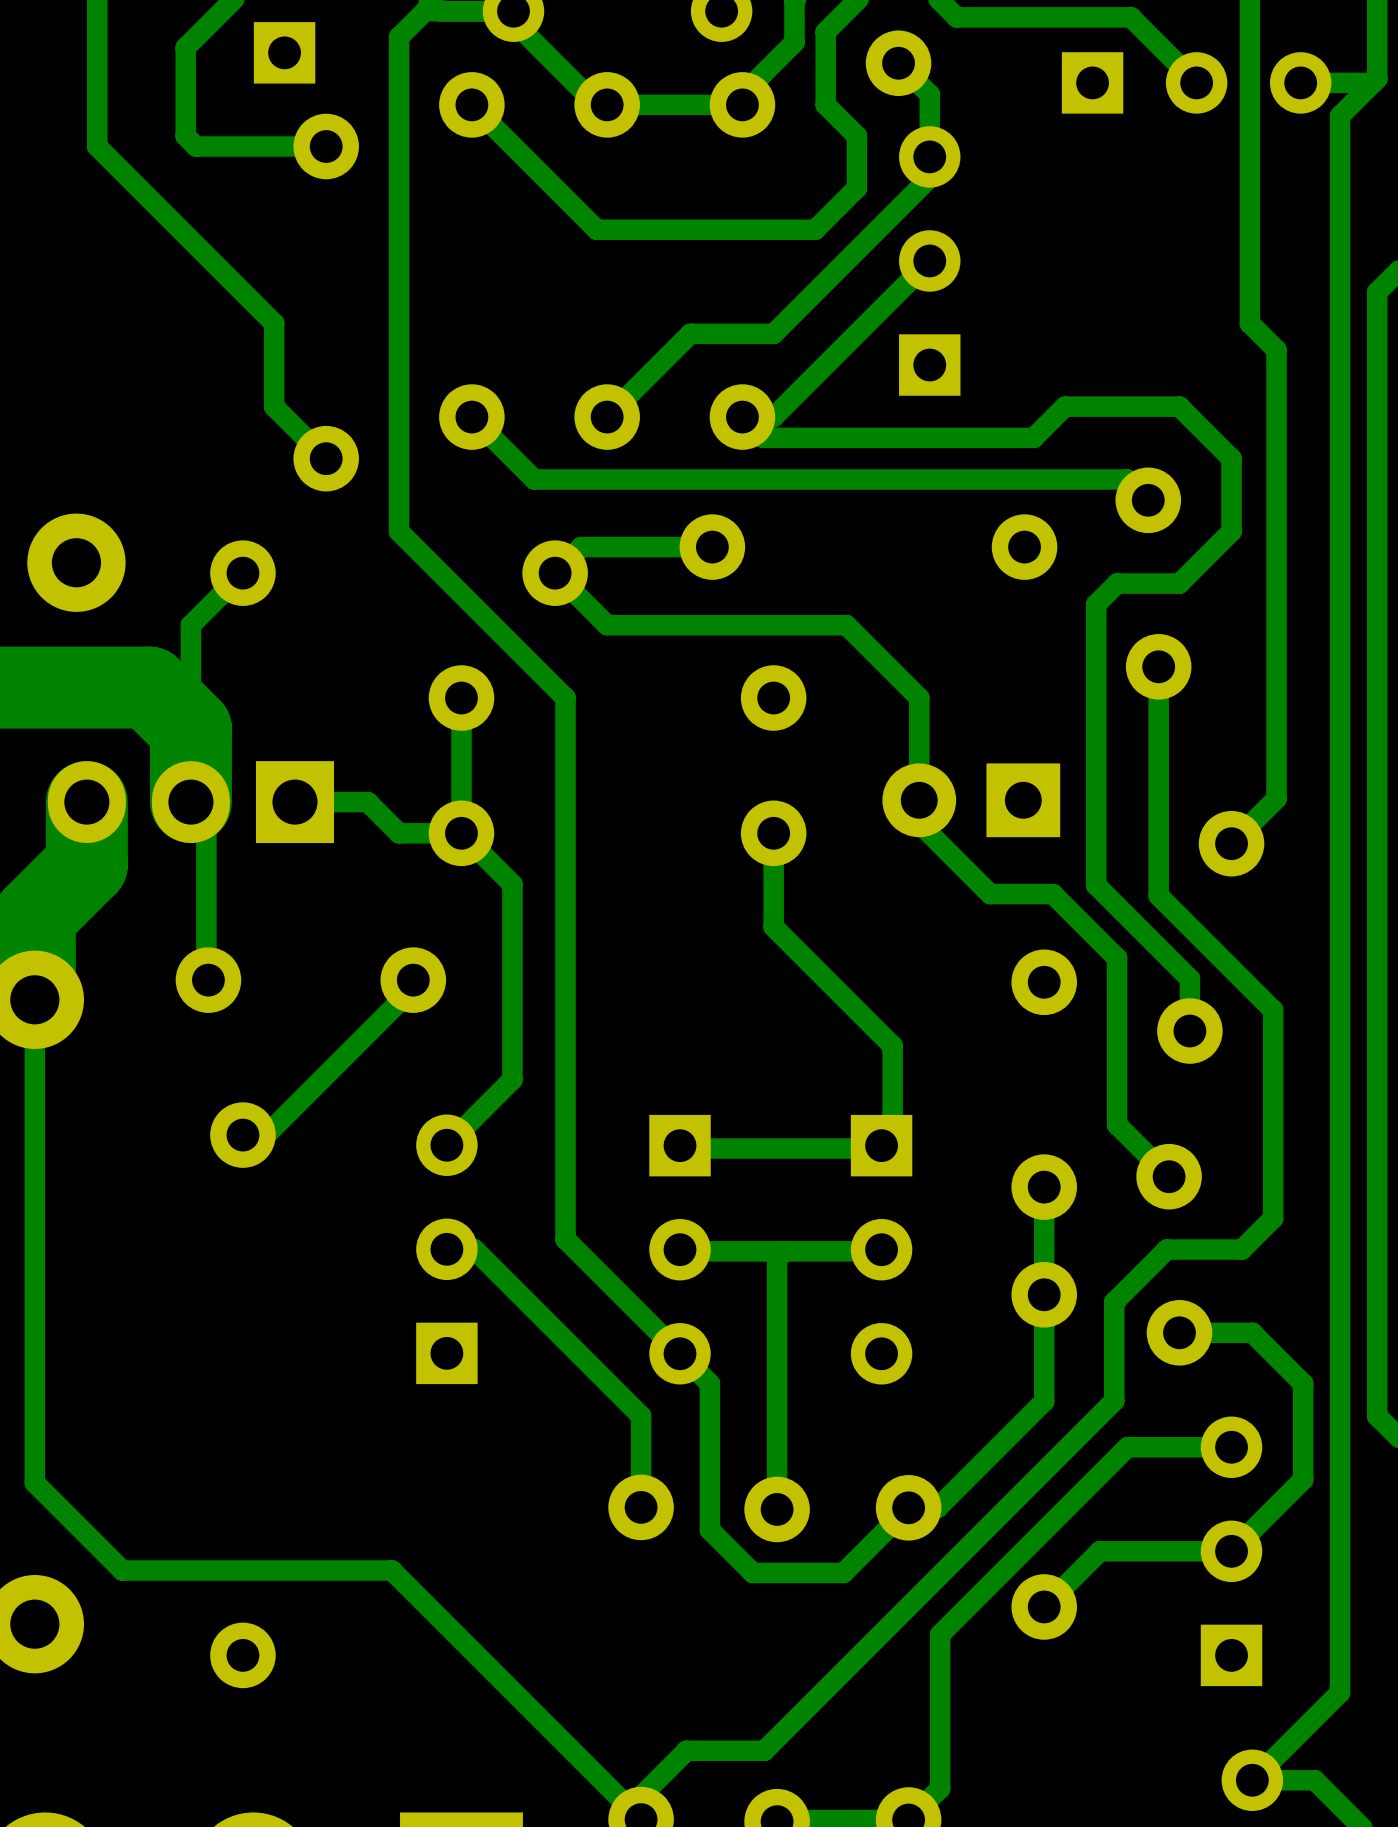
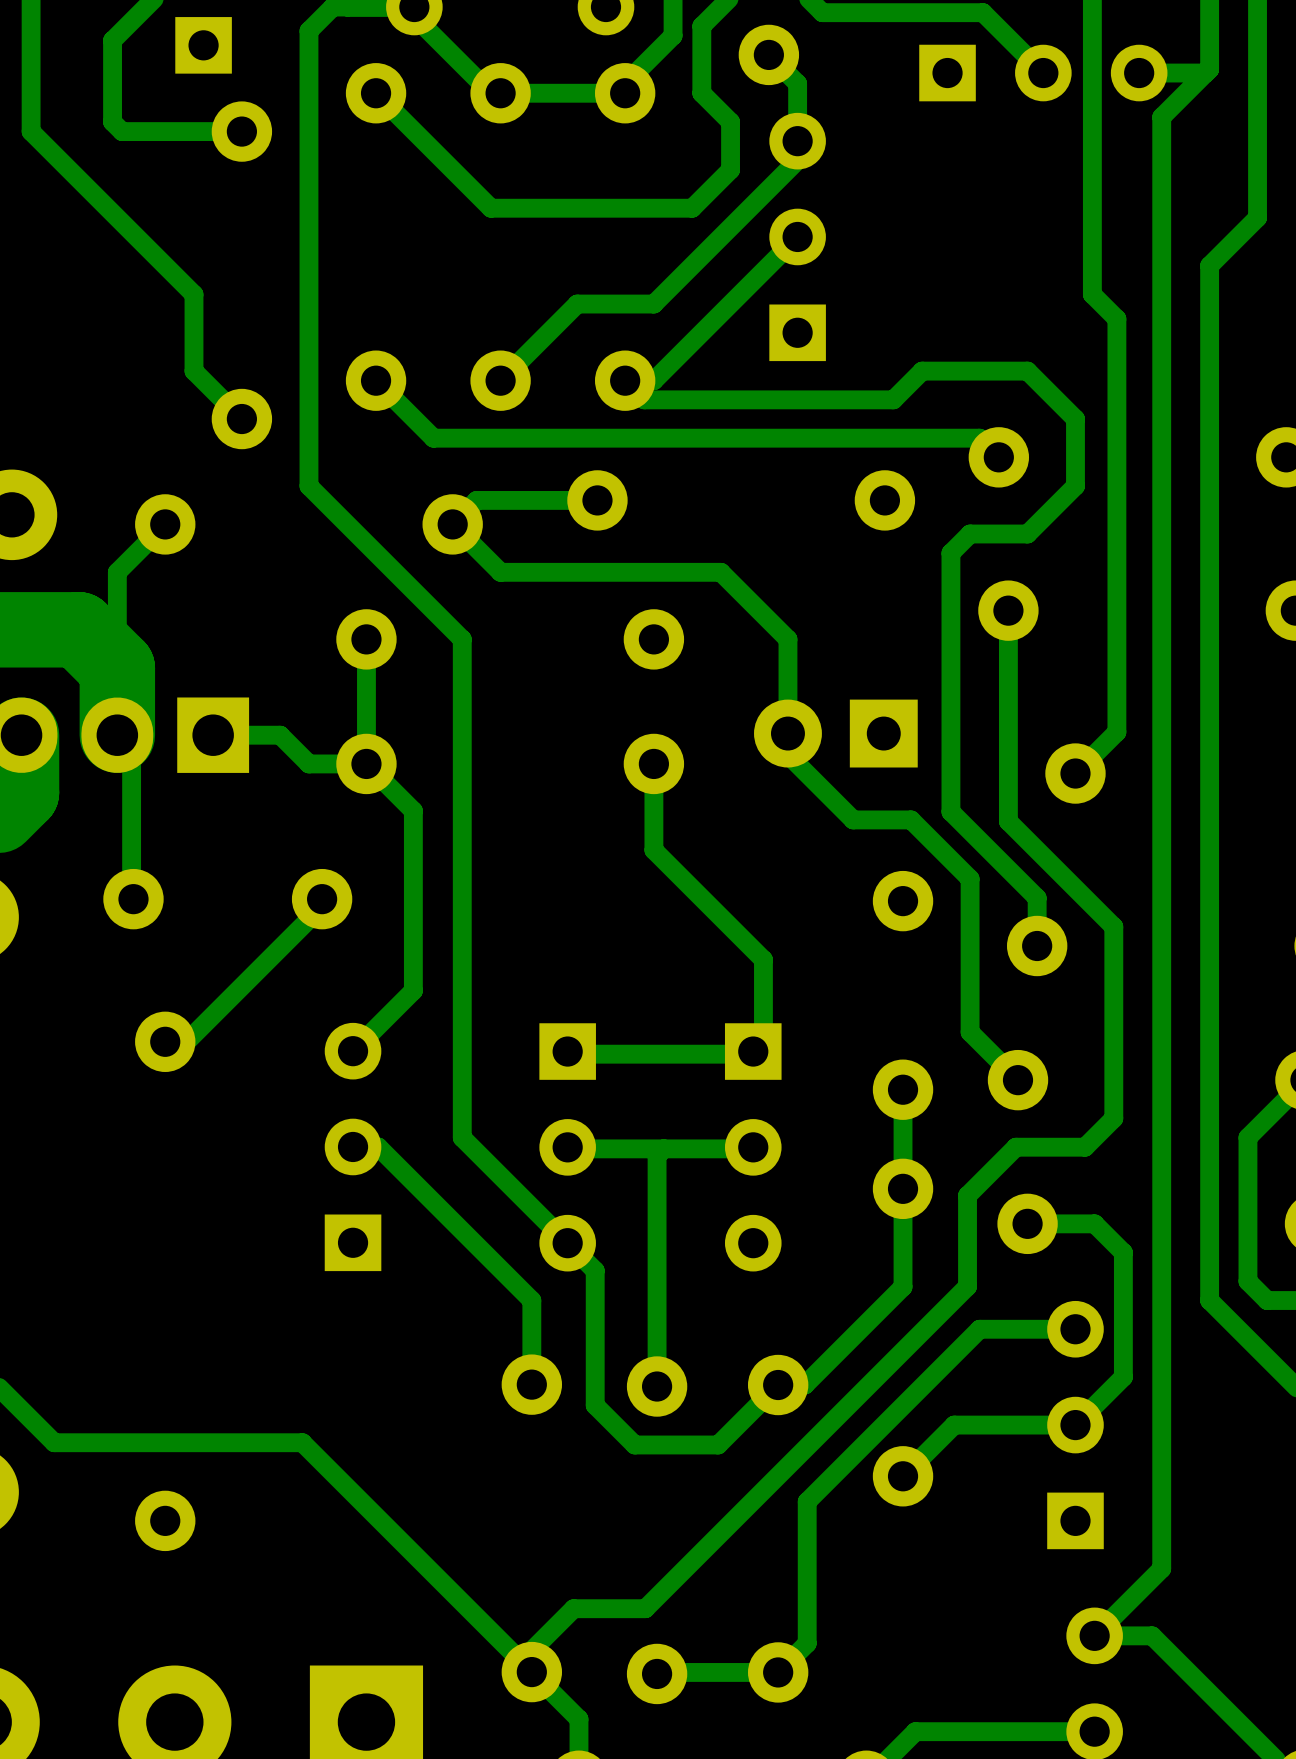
track: (1340, 116) (1340, 1692) (1325, 1707) -> (1175, 103) (1161, 117) (1161, 1568)
track: (1283, 1364) (1303, 1383) (1303, 1479) (1283, 1499) -> (1123, 1252) (1123, 1377)

